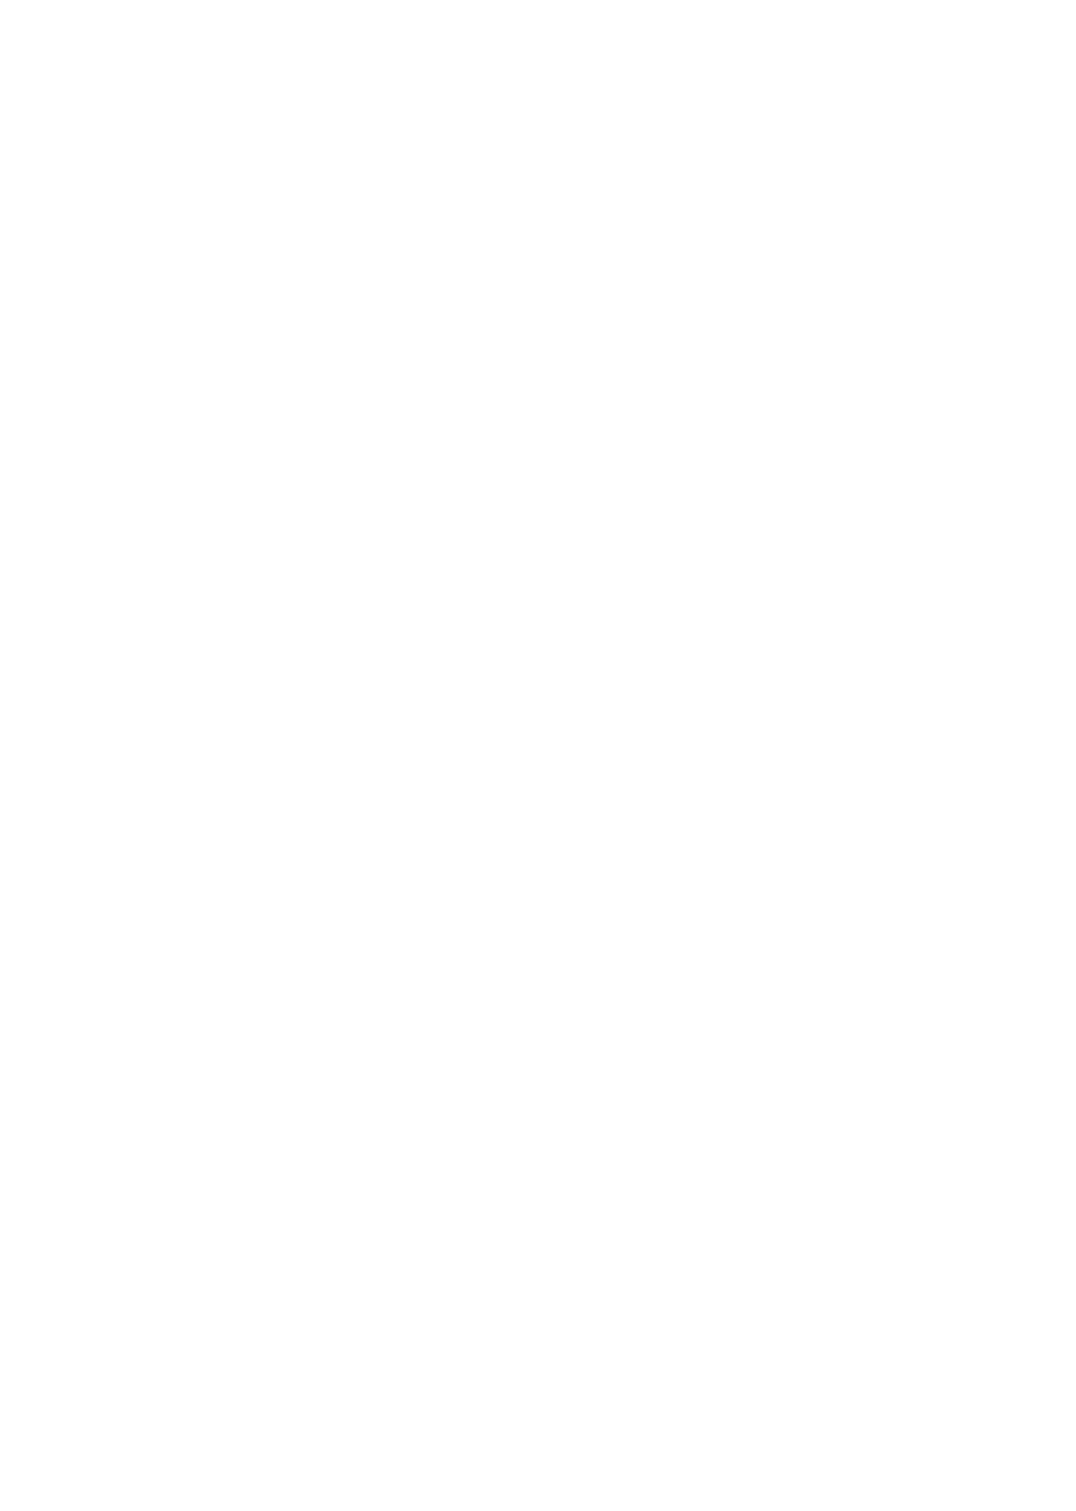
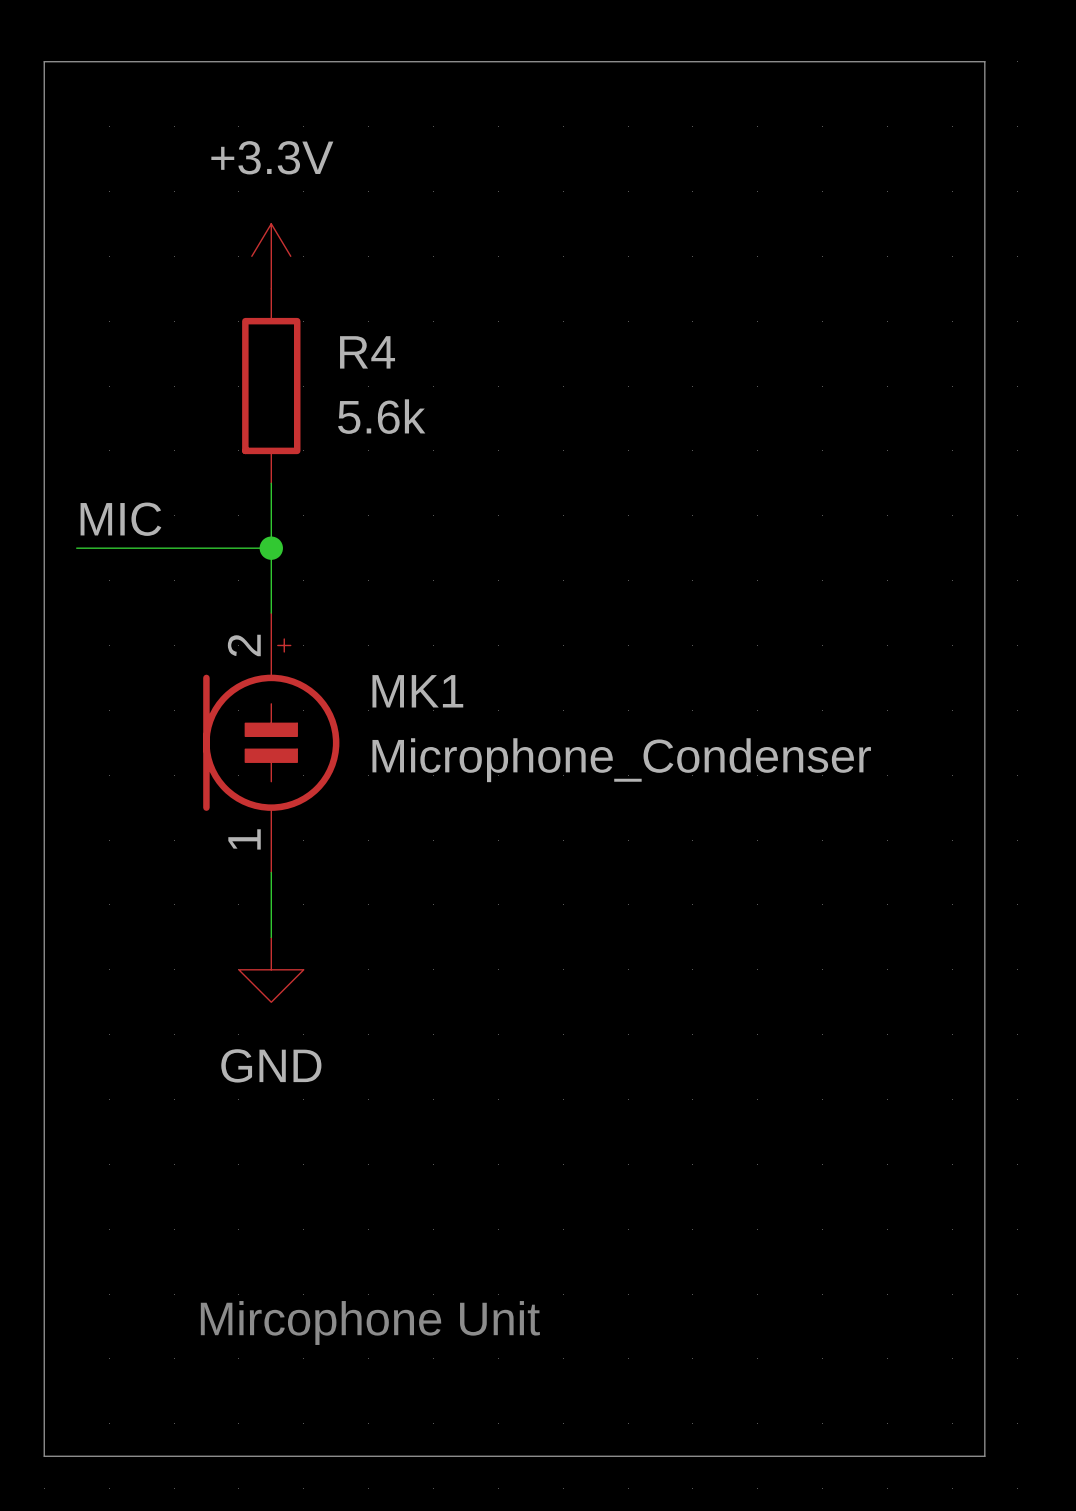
line: none -> (44, 61) (984, 61) (984, 1456) (44, 1456) (44, 61)
power symbol: none -> +3.3V (271, 256)
R4: none -> 5.6k (271, 386)
wire: none -> (271, 483) (271, 613)
label: none -> MIC (120, 519)
wire: none -> (76, 548) (271, 548)
junction: none -> (271, 548)
MK1: none -> Microphone_Condenser (271, 742)
wire: none -> (271, 872) (271, 937)
power symbol: none -> GND (271, 969)
text: none -> Mircophone Unit (370, 1322)

